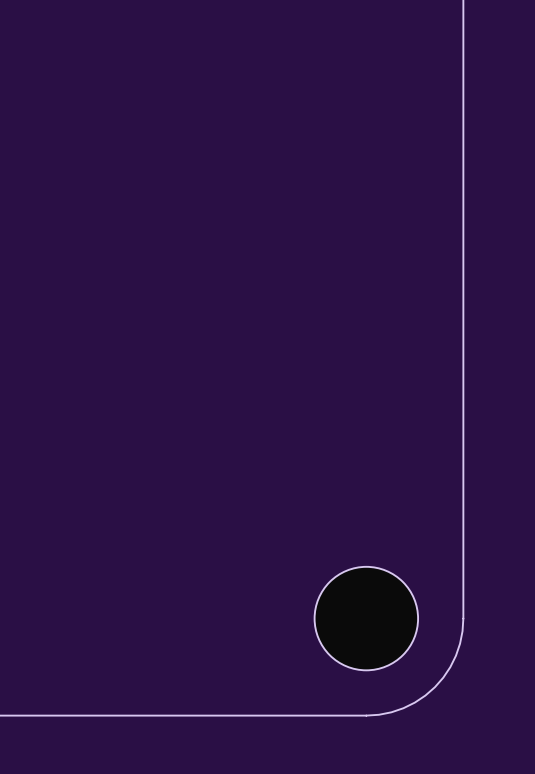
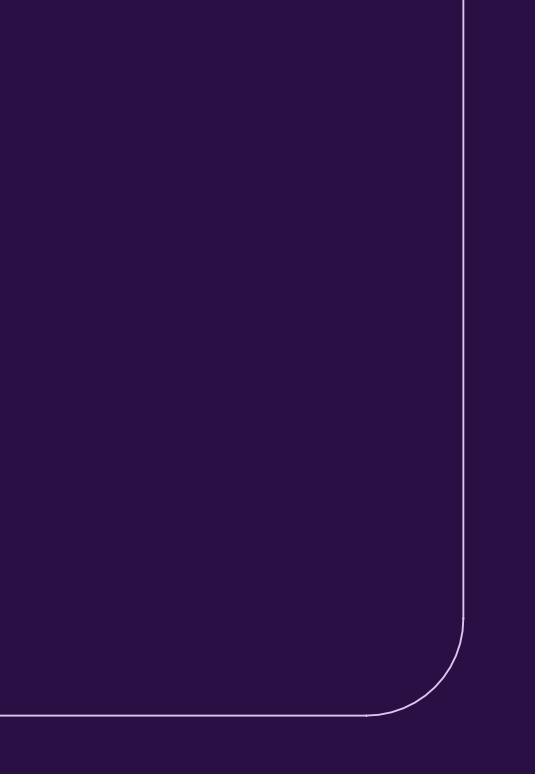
part: (366, 618) -> none

